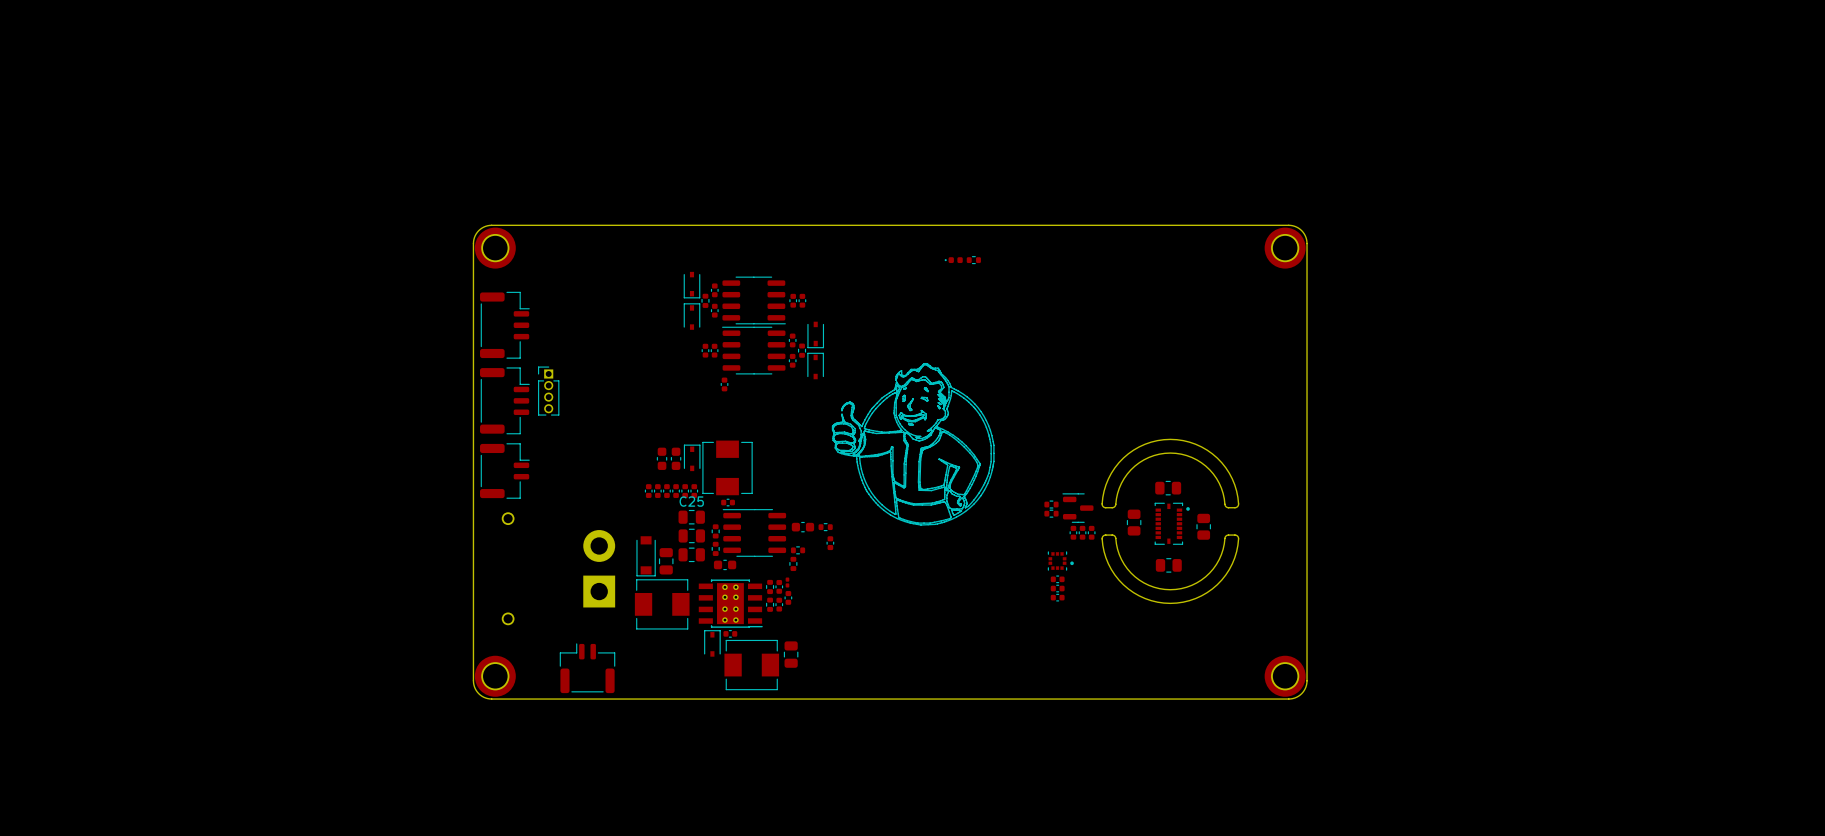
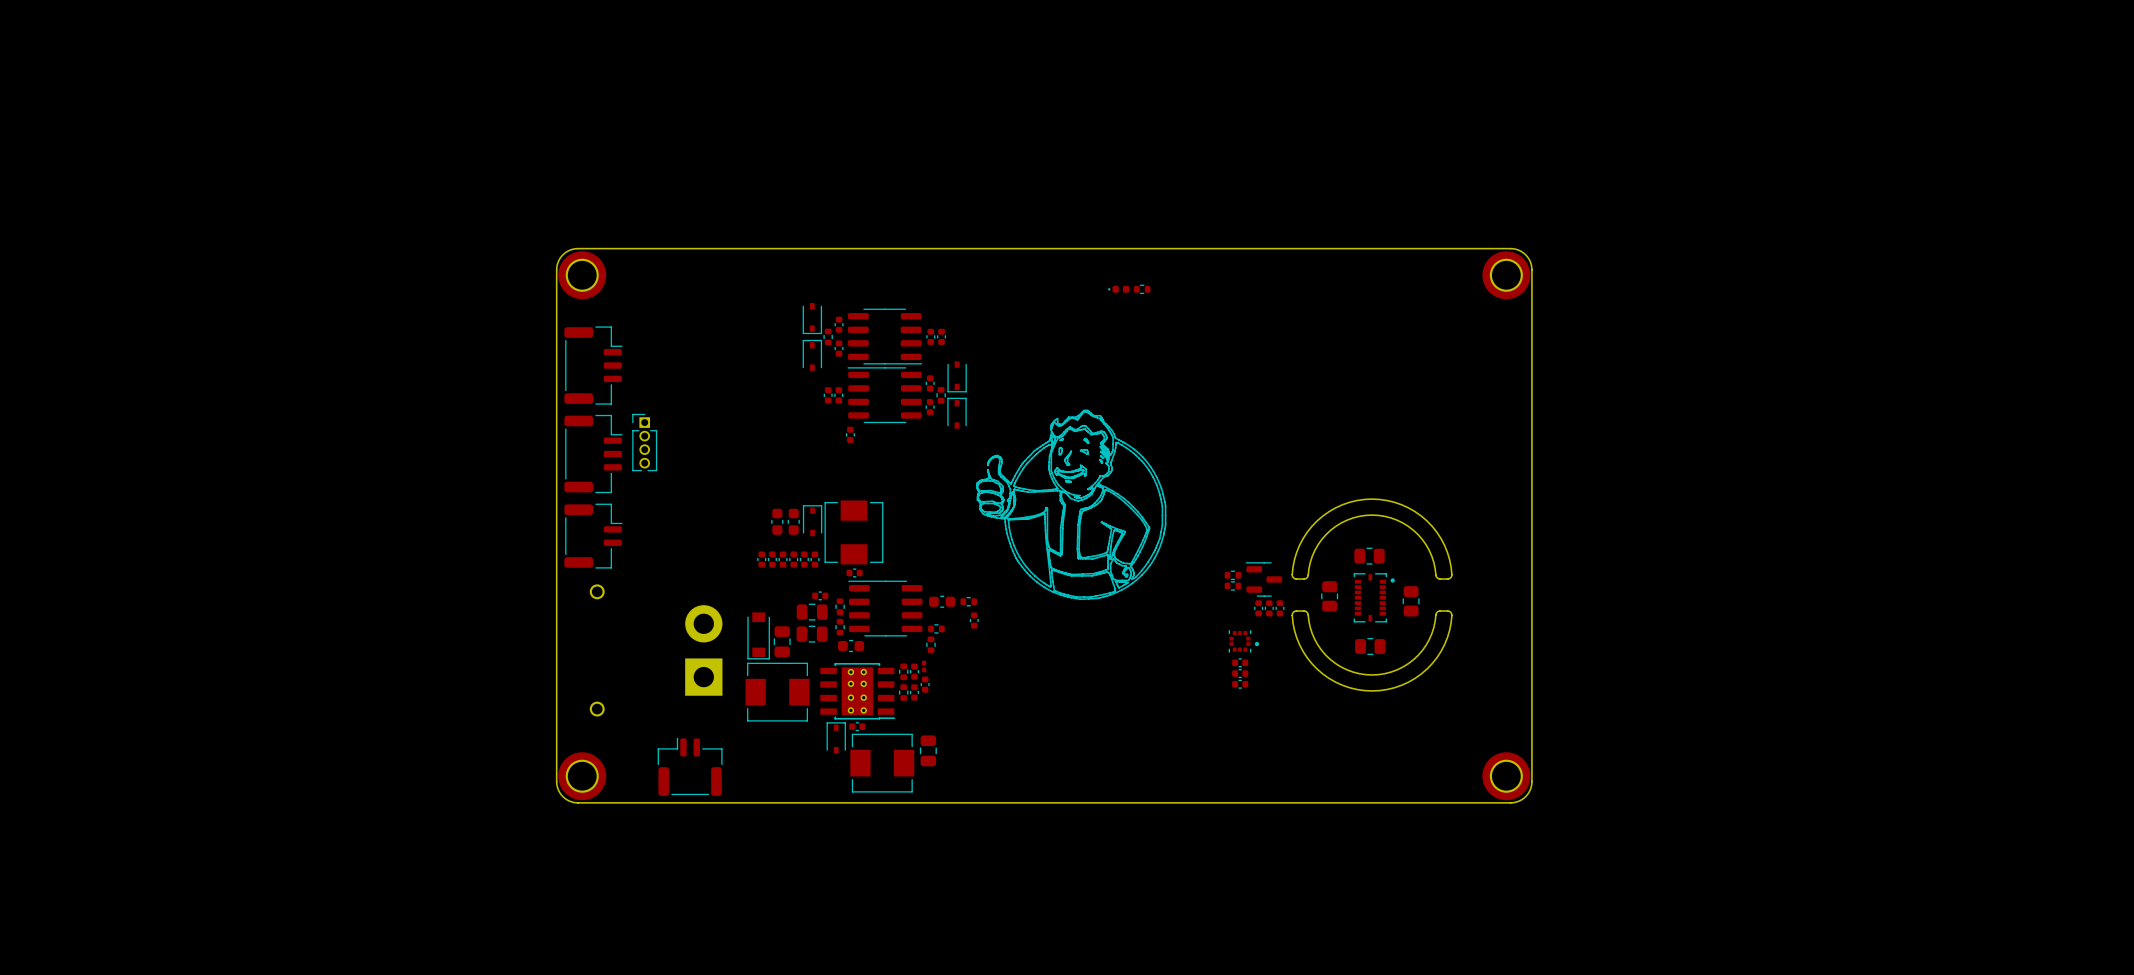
C25: (691, 517) -> none
part: none -> (820, 595)

